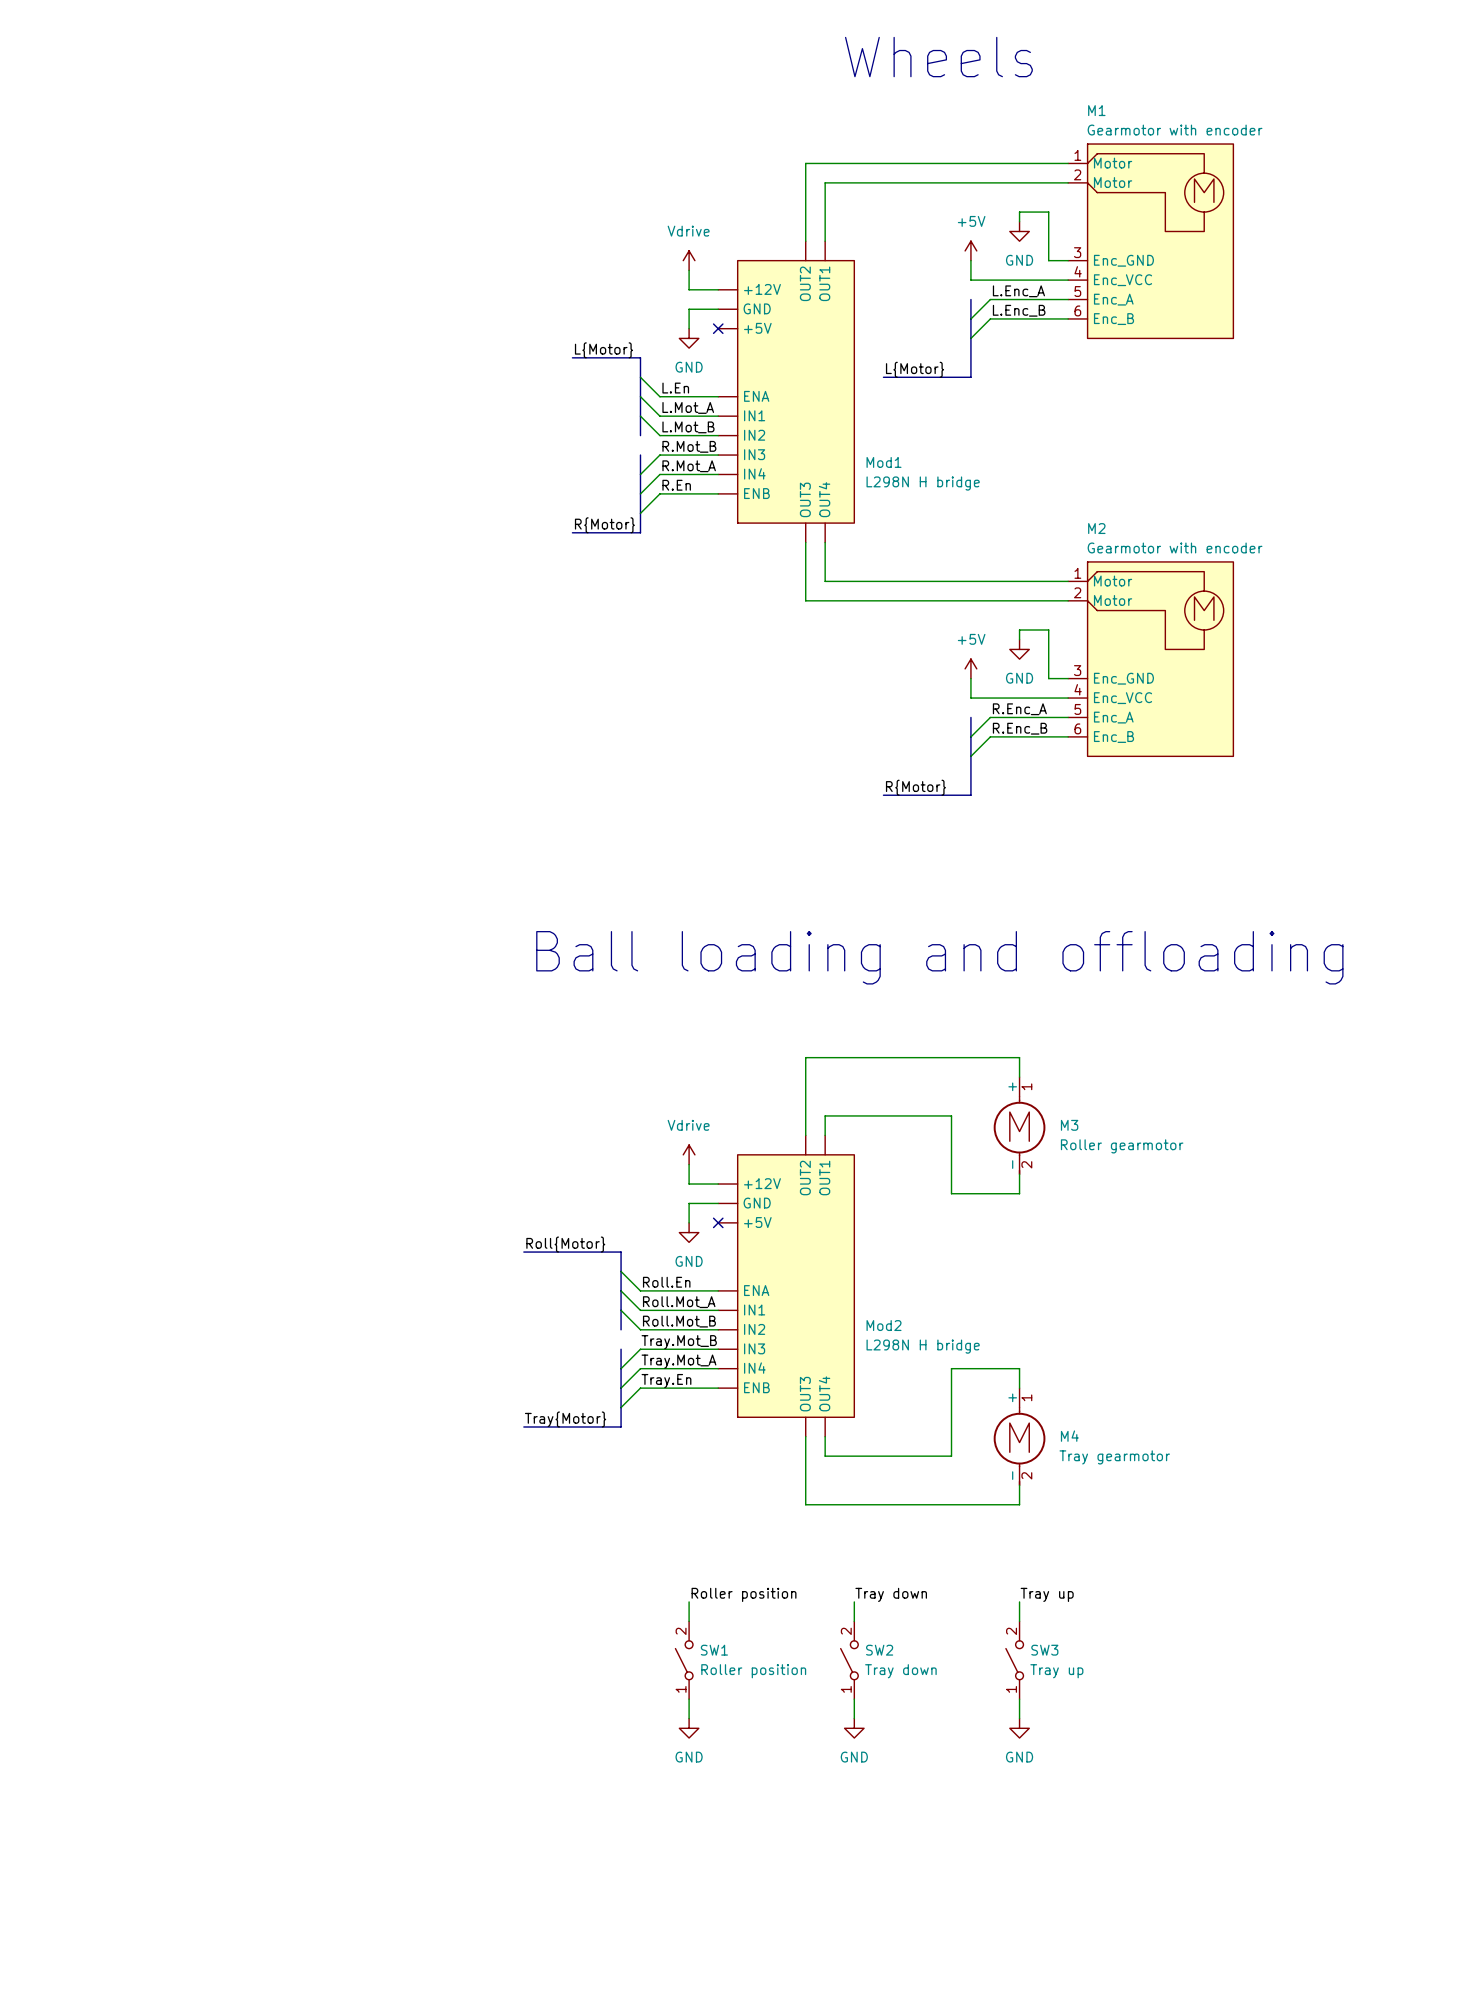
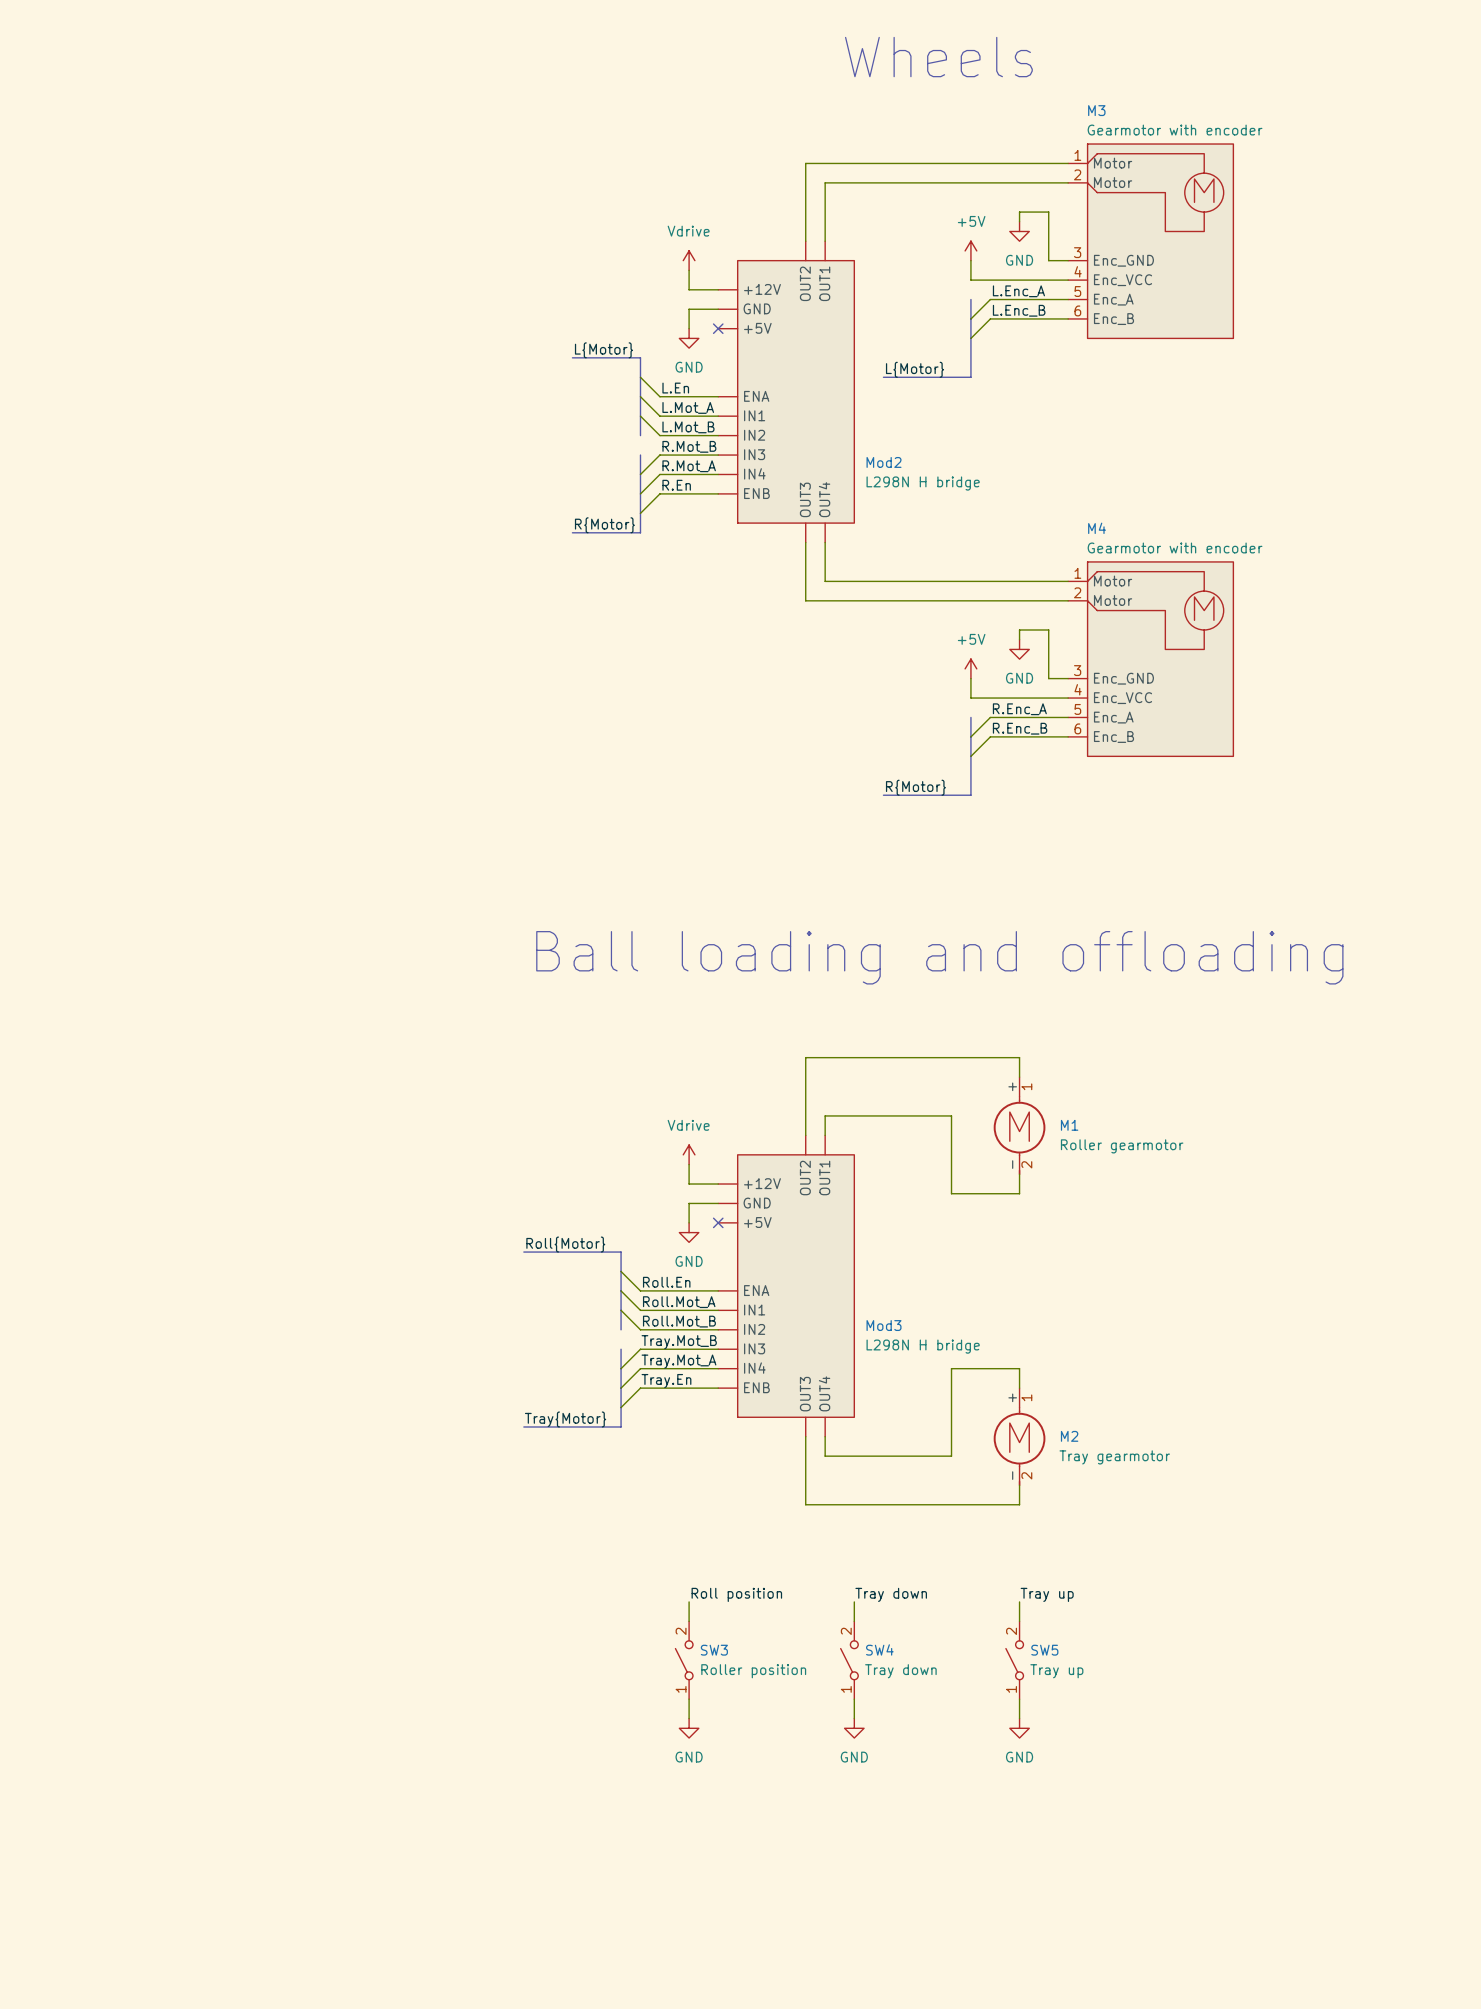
M1 name: M1 (1096, 110) -> M3 (1096, 110)
Mod1 name: Mod1 (884, 462) -> Mod2 (884, 462)
M2 name: M2 (1096, 528) -> M4 (1097, 528)
M3 name: M3 (1069, 1125) -> M1 (1069, 1125)
Mod2 name: Mod2 (884, 1325) -> Mod3 (884, 1325)
M4 name: M4 (1069, 1436) -> M2 (1069, 1436)
label: Roller position (744, 1594) -> Roll position (736, 1594)
SW1 name: SW1 (714, 1650) -> SW3 (714, 1650)
SW2 name: SW2 (879, 1650) -> SW4 (879, 1649)
SW3 name: SW3 (1044, 1650) -> SW5 (1044, 1650)

